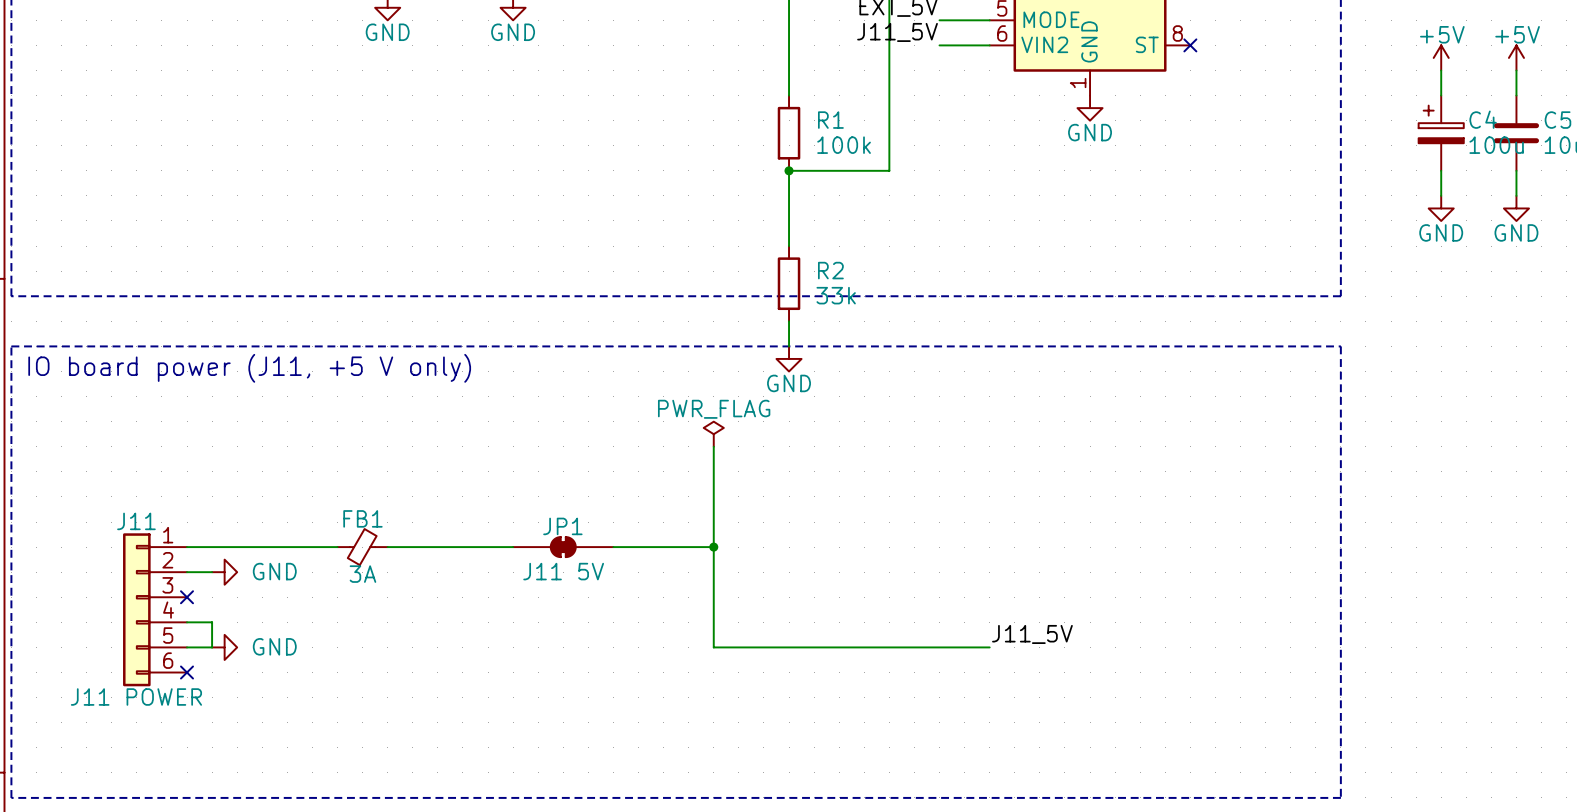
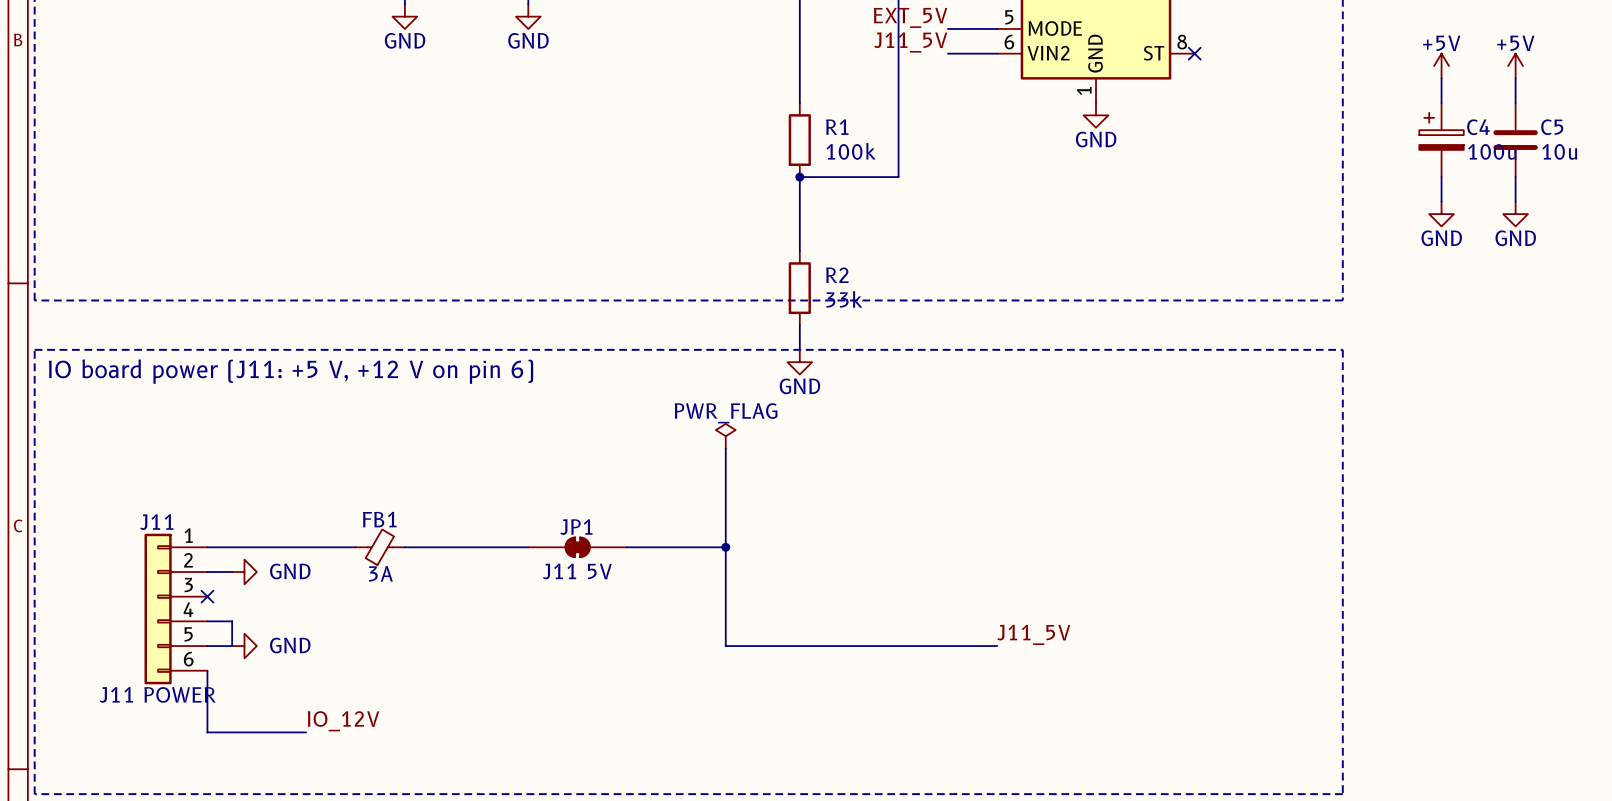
text: IO board power (J11, +5 V only) (249, 368) -> IO board power (J11: +5 V, +12 V on pin 6) (291, 371)
wire: none -> (207, 670) (207, 732) (306, 732)
no-connect mark: (187, 672) -> none
label: none -> IO_12V (343, 721)

